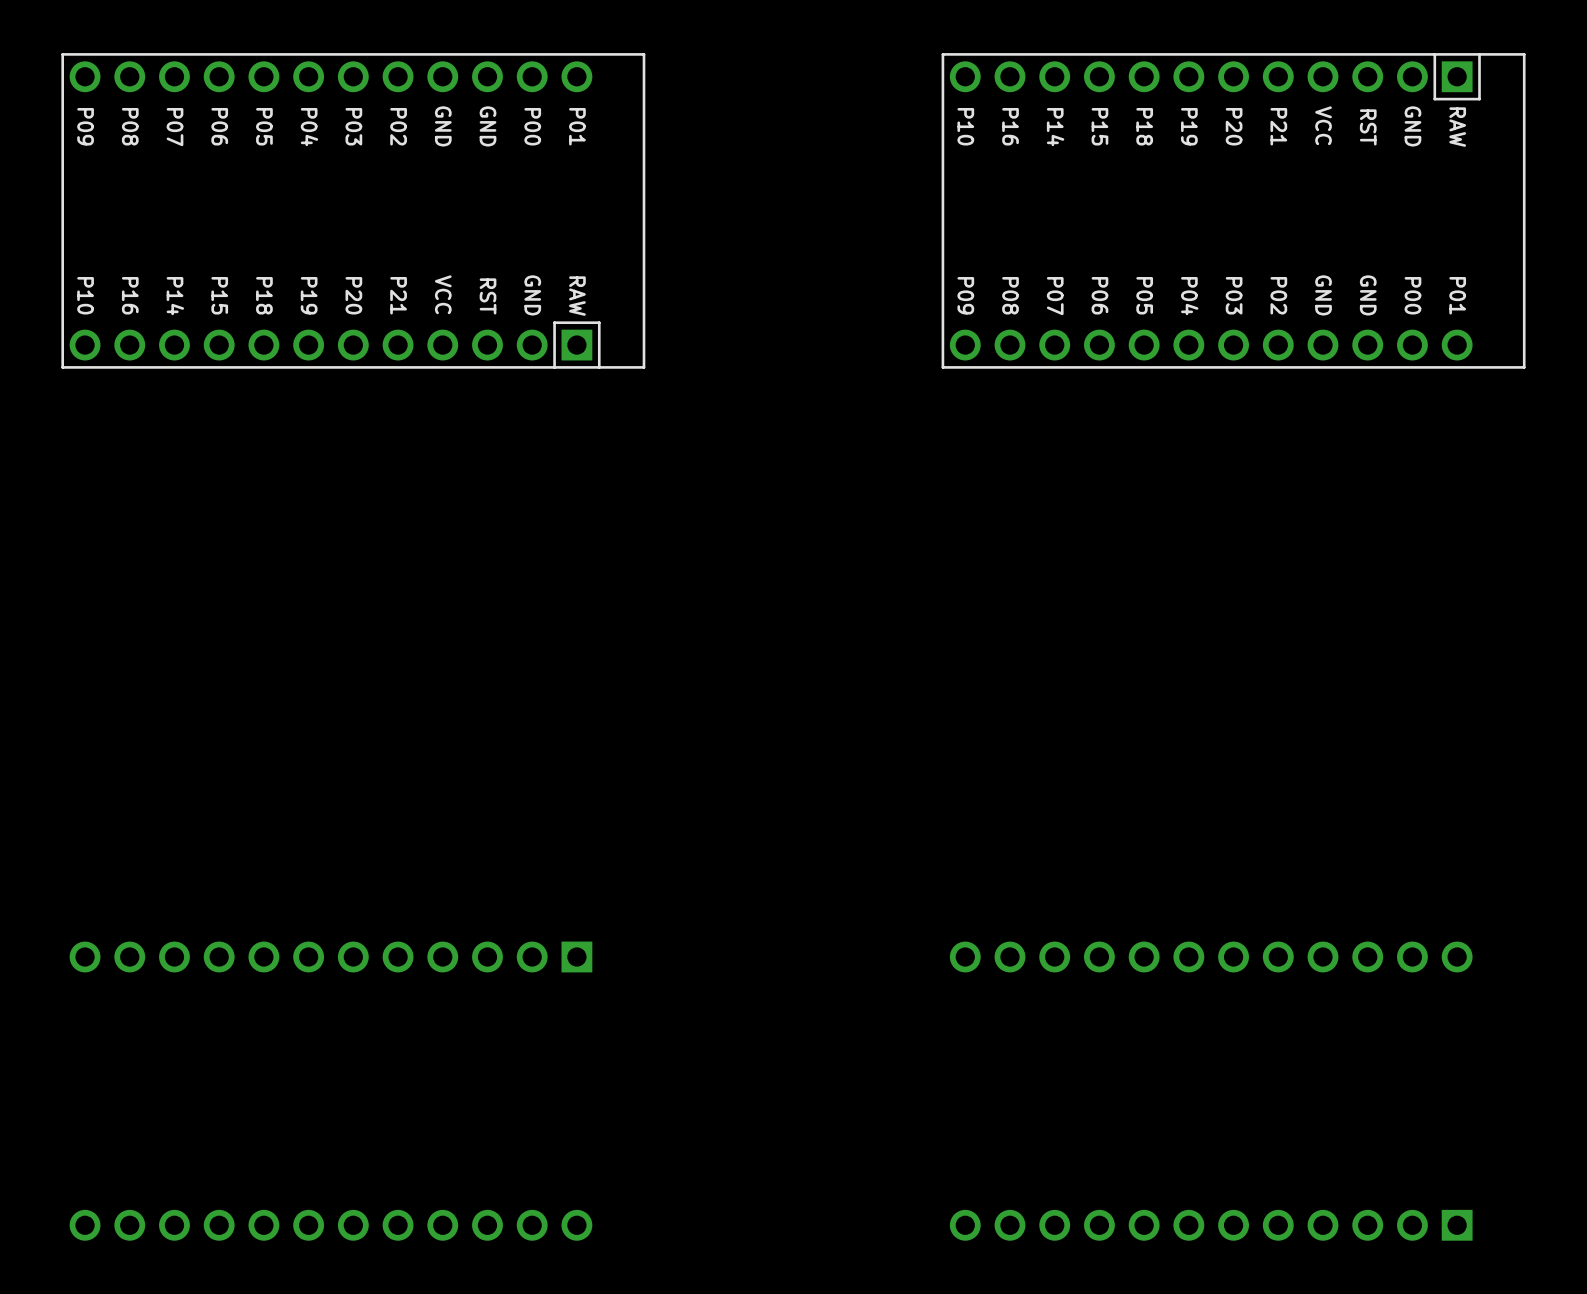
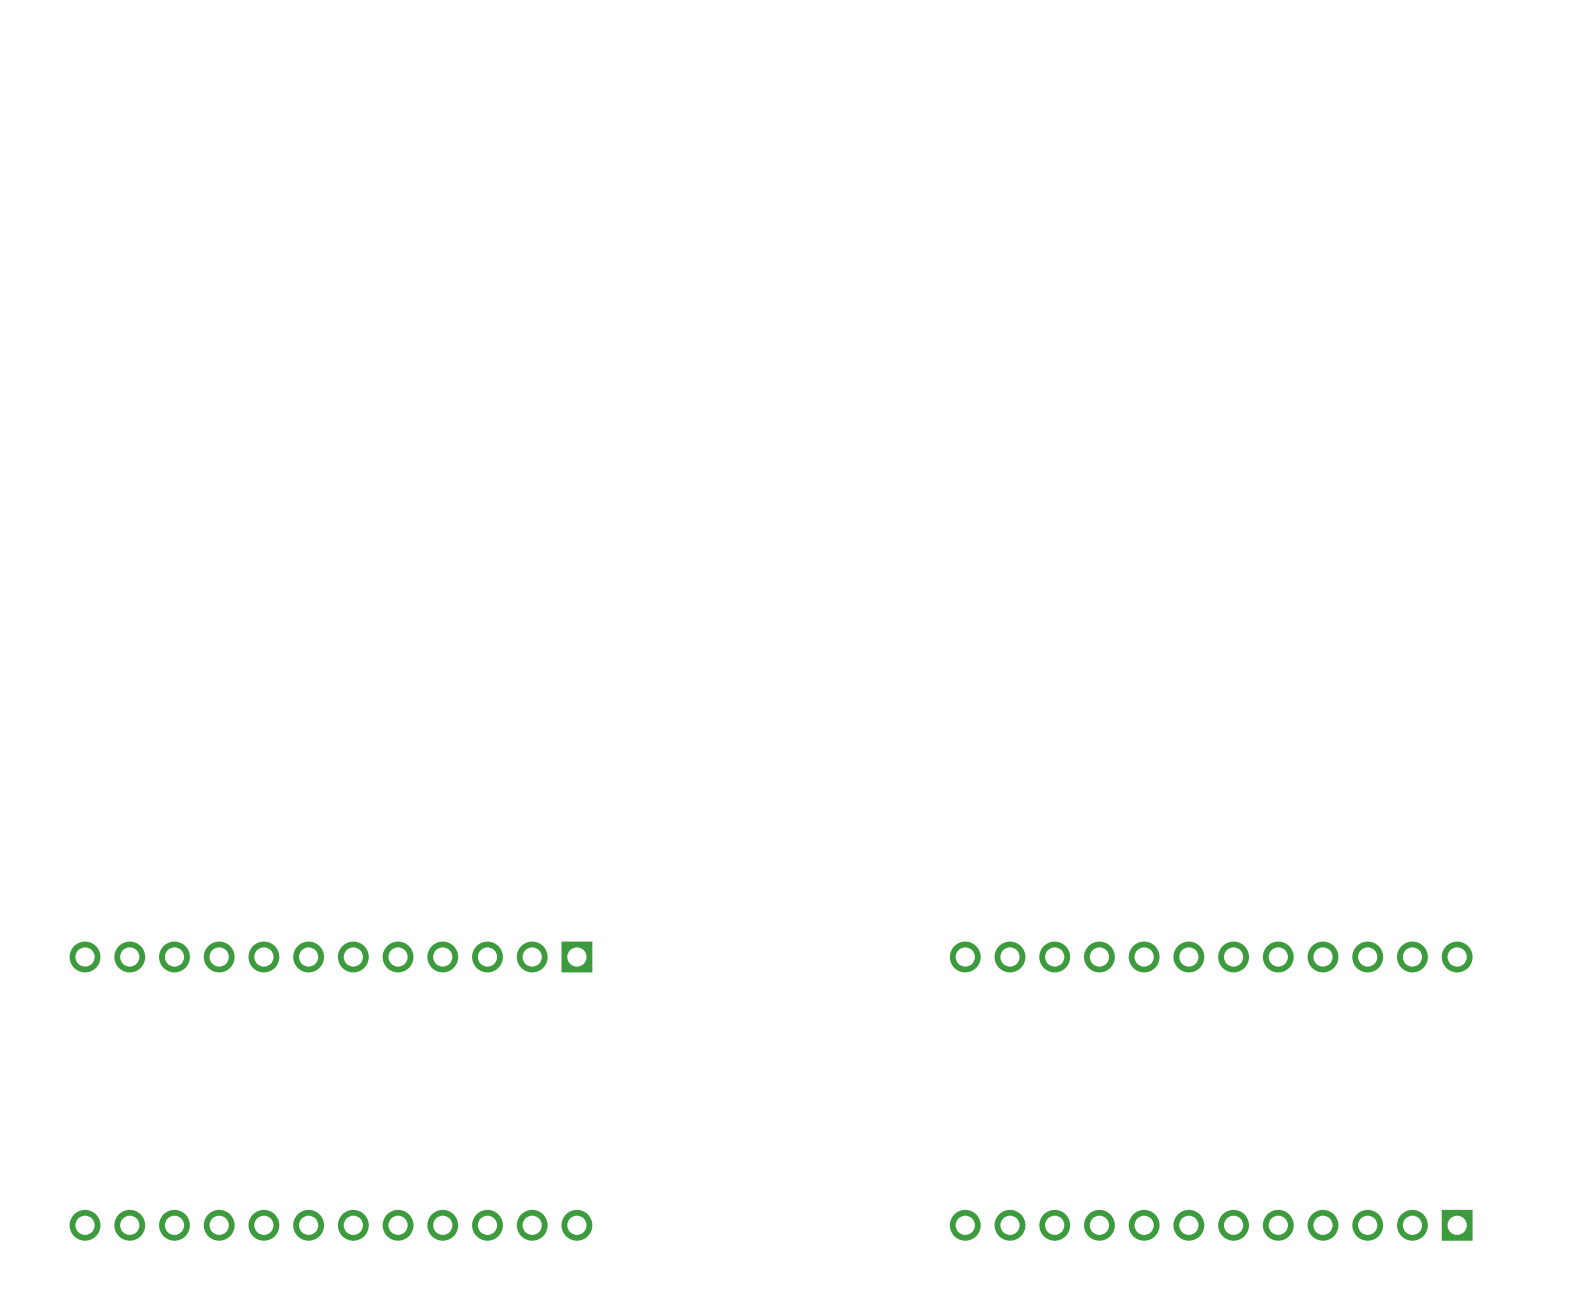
part: (353, 210) -> none
part: (1233, 210) -> none

